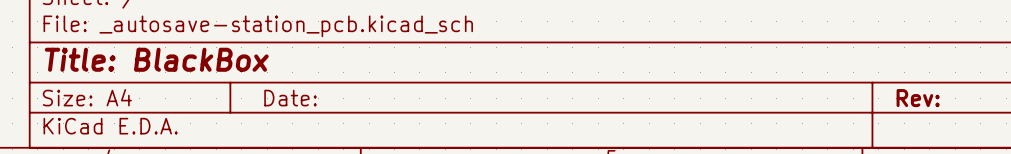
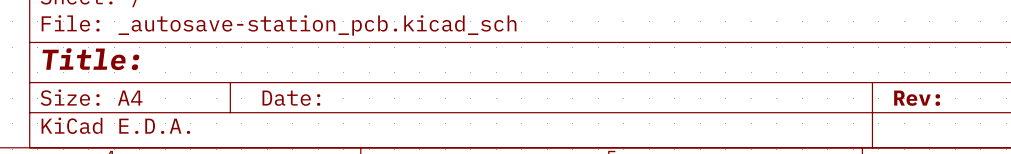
title block: Title: BlackBox (156, 59) -> Title: (90, 59)

